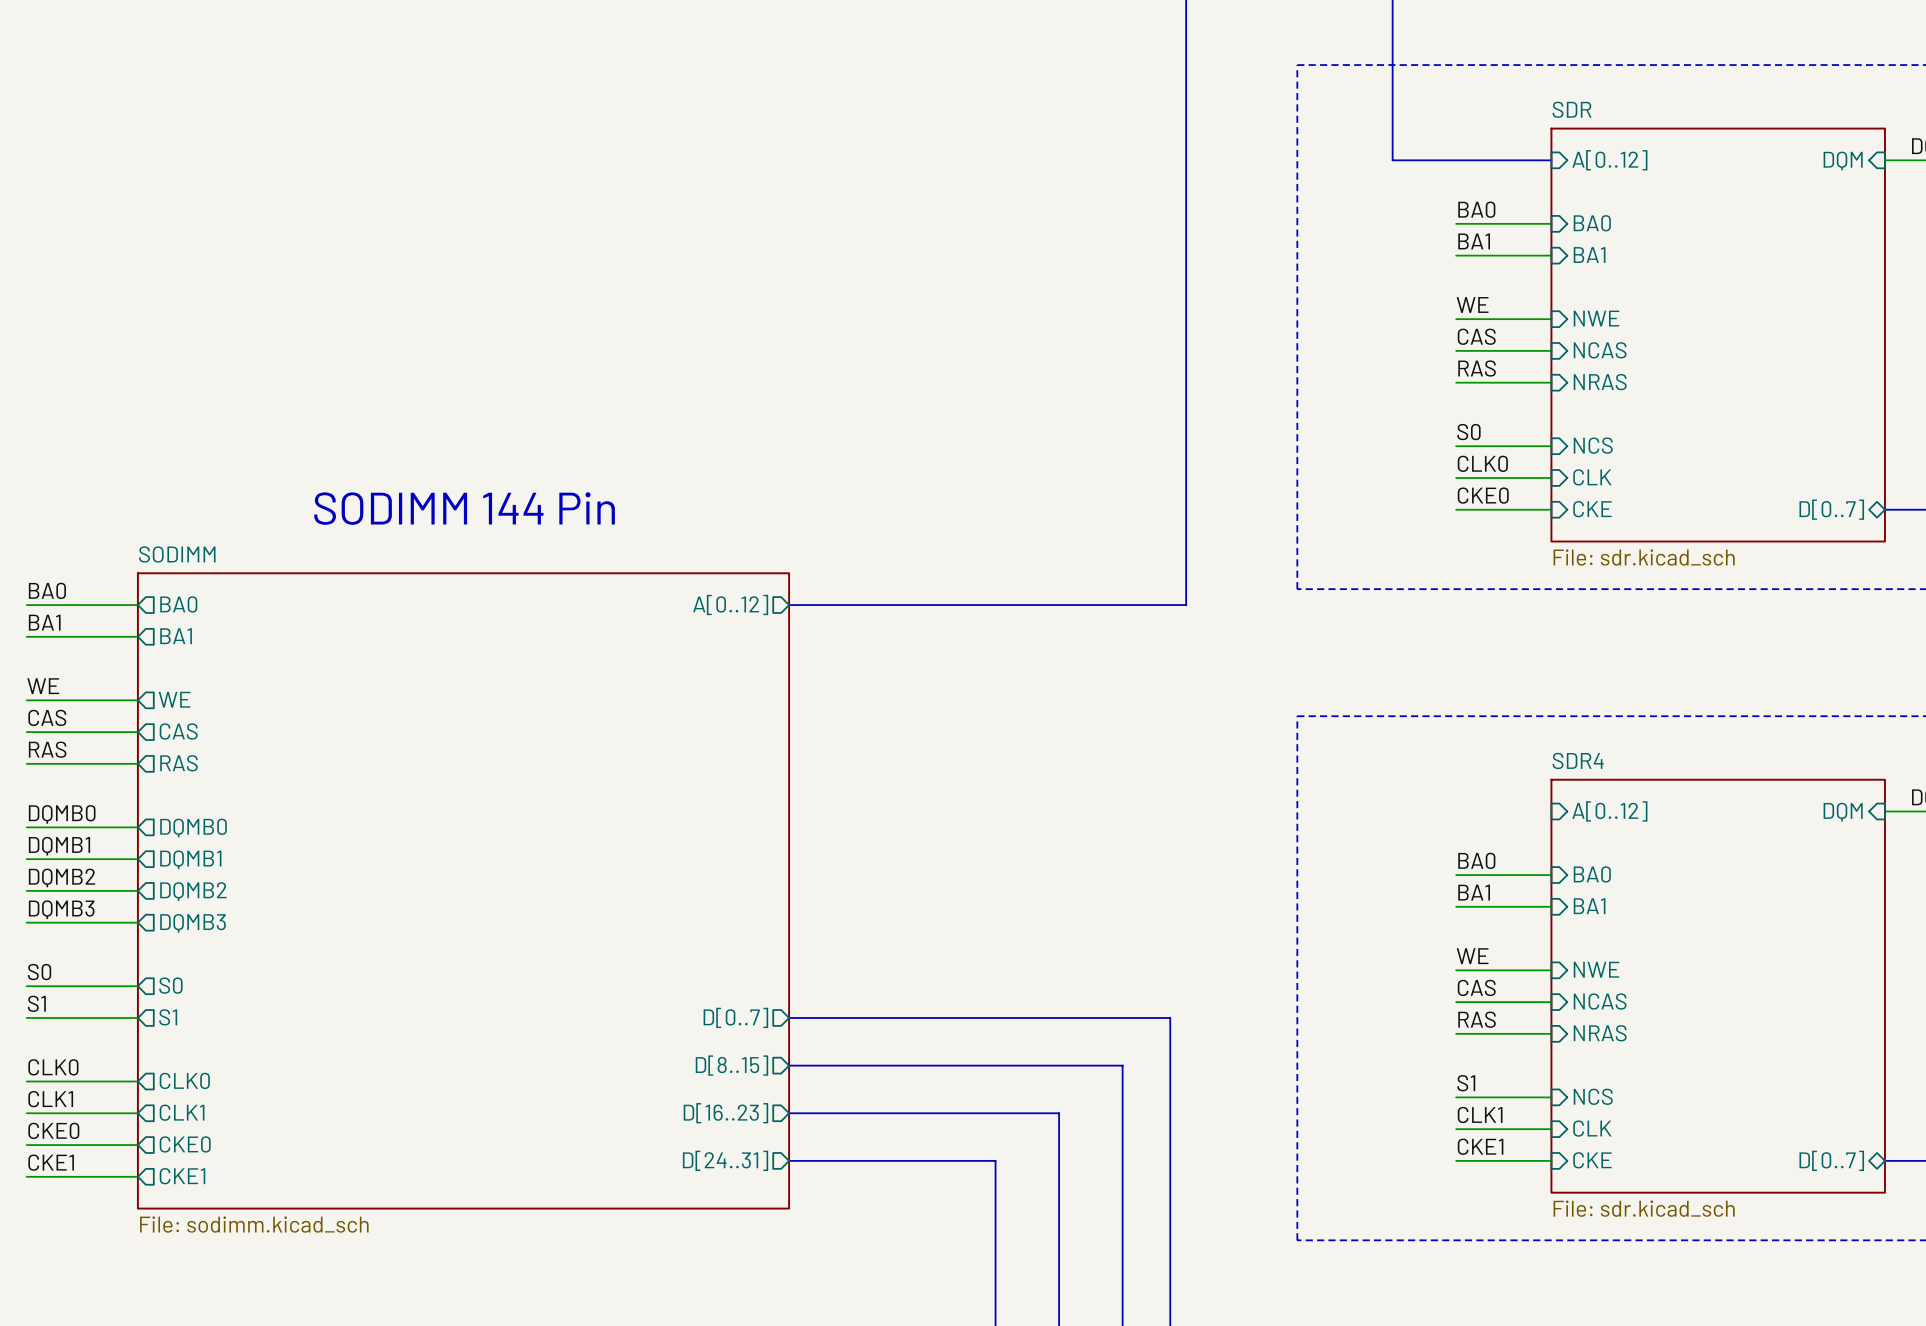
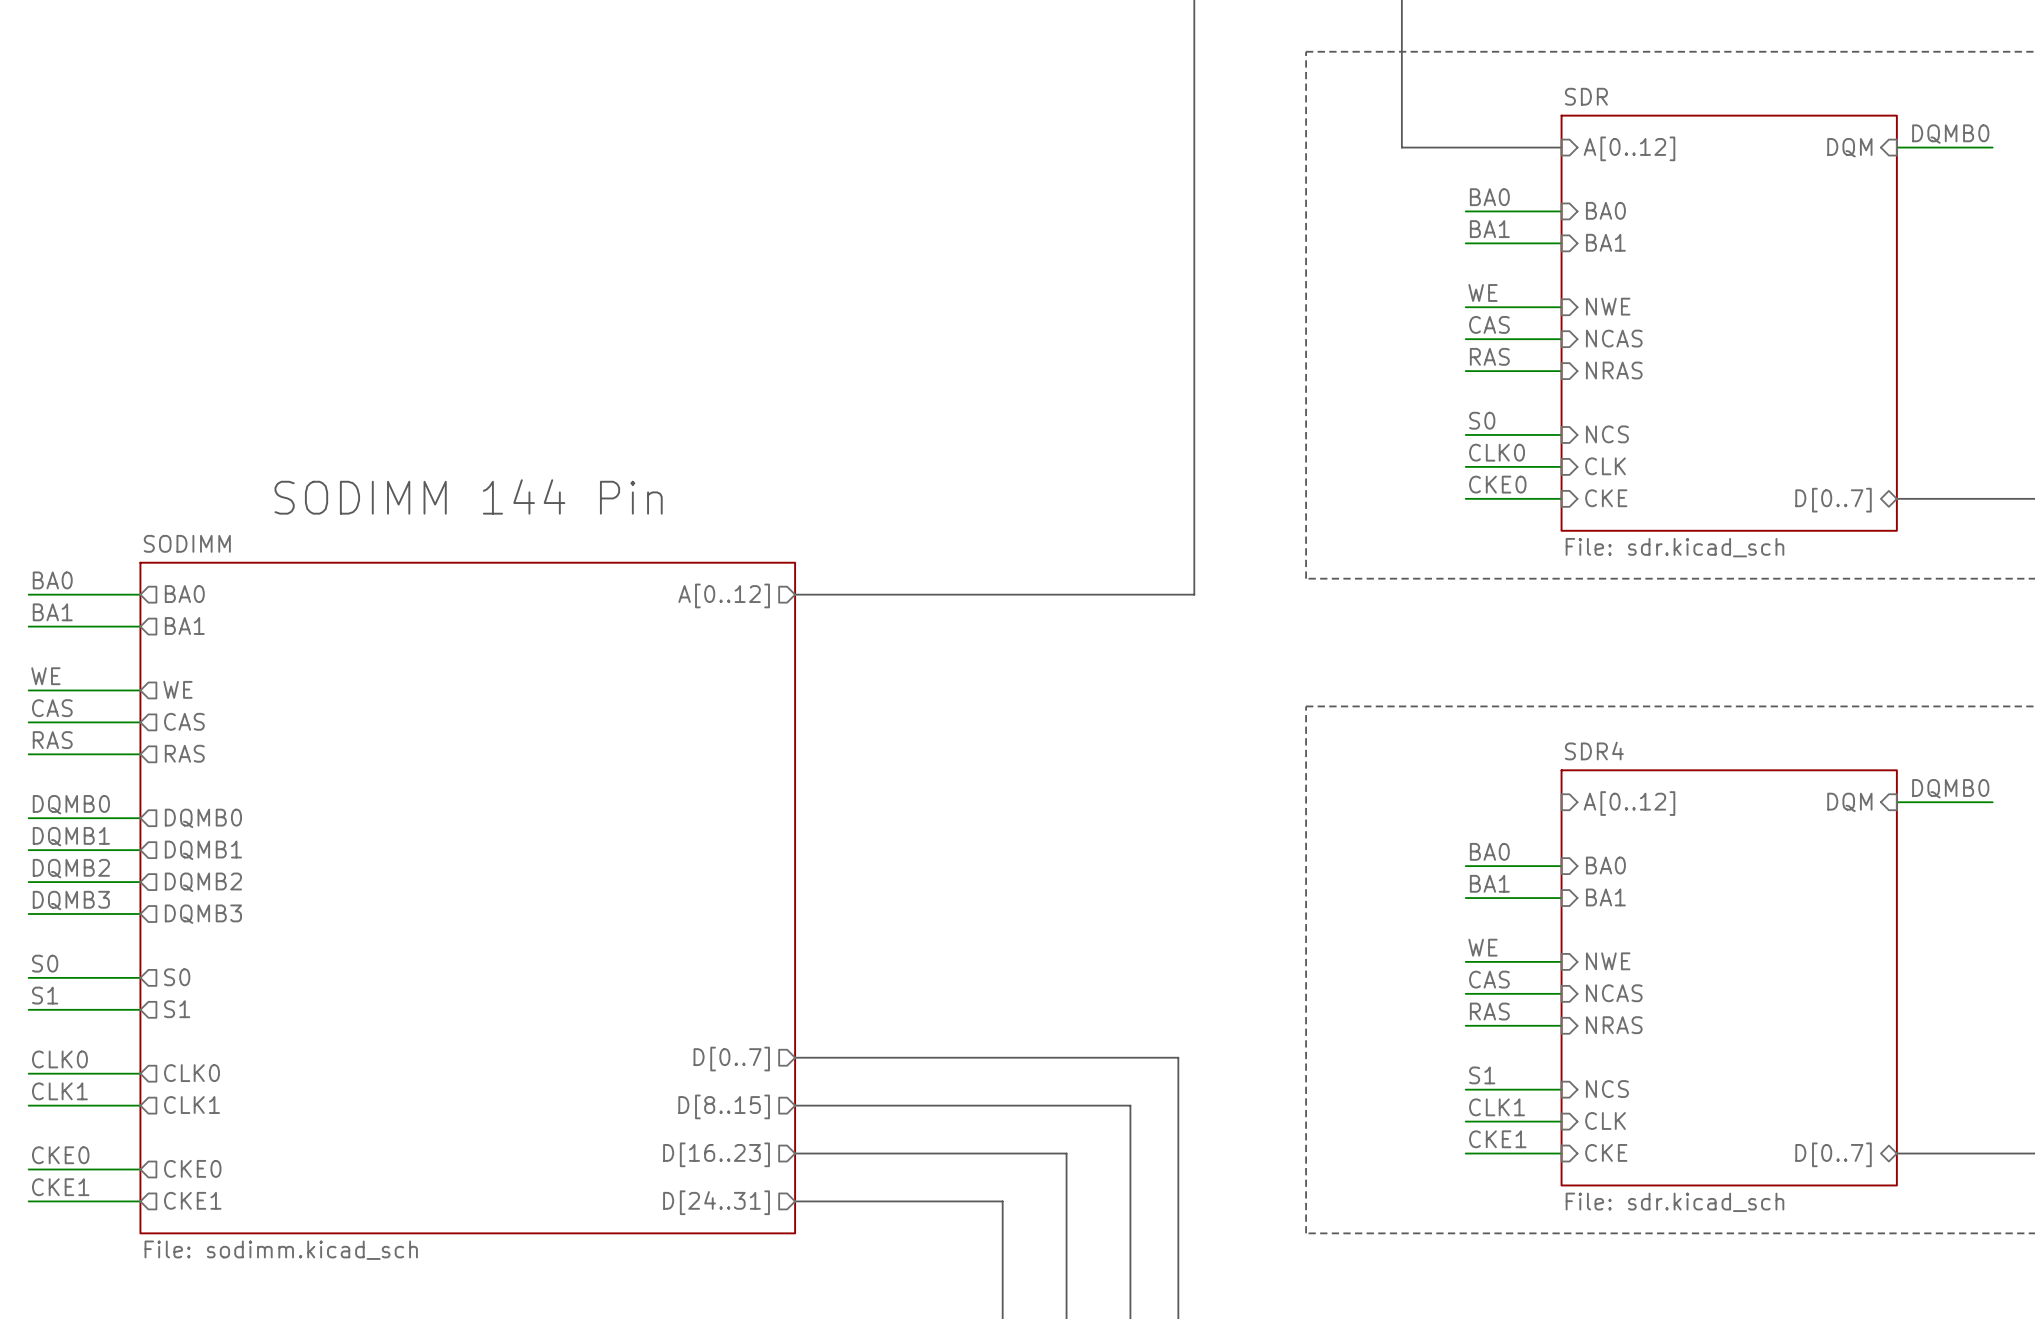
sheet SODIMM: File: sodimm.kicad_sch (463, 890) -> none
sheet SODIMM: none -> File: sodimm.kicad_sch (467, 898)
sheet pin: D[0..7] (735, 1017) -> none
bus: (789, 1017) (1170, 1017) (1170, 1065) -> none
sheet pin: D[8..15] (731, 1065) -> D[0..7] (731, 1059)
bus: (1122, 1065) (1122, 1113) -> (1130, 1057) (1178, 1057)
sheet pin: D[16..23] (725, 1113) -> D[8..15] (724, 1106)
bus: (1059, 1113) (1059, 1160) -> (1066, 1105) (1130, 1105)
label: CKE0 (53, 1130) -> none
sheet pin: CKE0 (185, 1144) -> none
wire: (26, 1145) (137, 1145) -> (28, 1201) (140, 1201)
sheet pin: D[24..31] (725, 1160) -> D[16..23] (716, 1154)
bus: (995, 1160) (995, 1208) -> (1002, 1153) (1066, 1153)
label: CKE1 (51, 1162) -> CKE0 (60, 1155)
sheet pin: CKE1 (182, 1176) -> CKE0 (192, 1168)
label: none -> CKE1 (60, 1187)
sheet pin: none -> CKE1 (192, 1200)
sheet pin: none -> D[24..31] (716, 1202)
bus: none -> (795, 1201) (1002, 1201)

